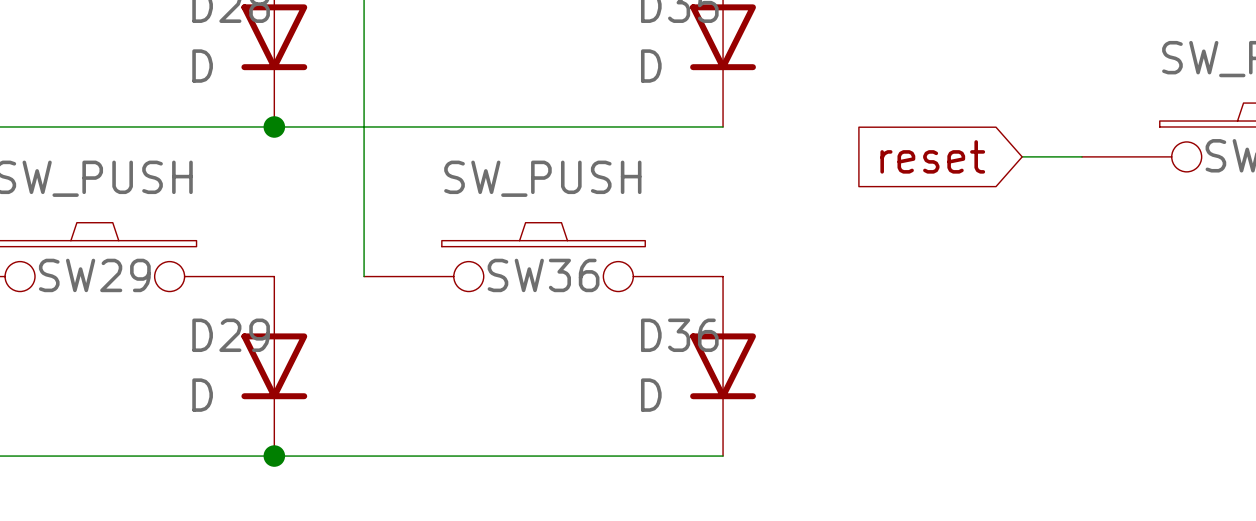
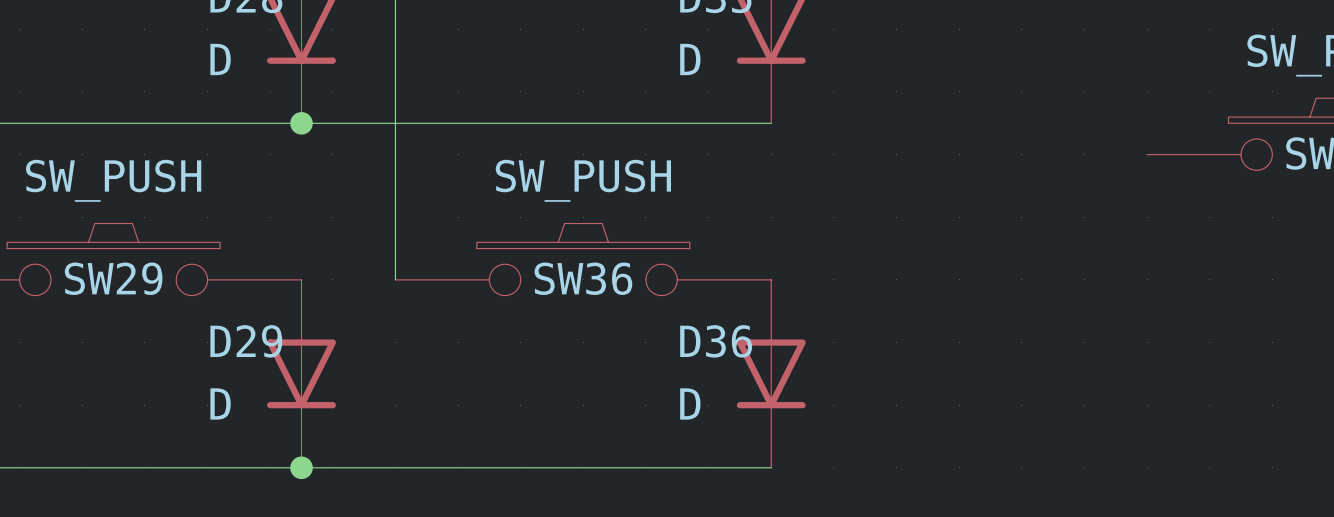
global label: reset (932, 156) -> none
wire: (1022, 156) (1082, 156) -> none

